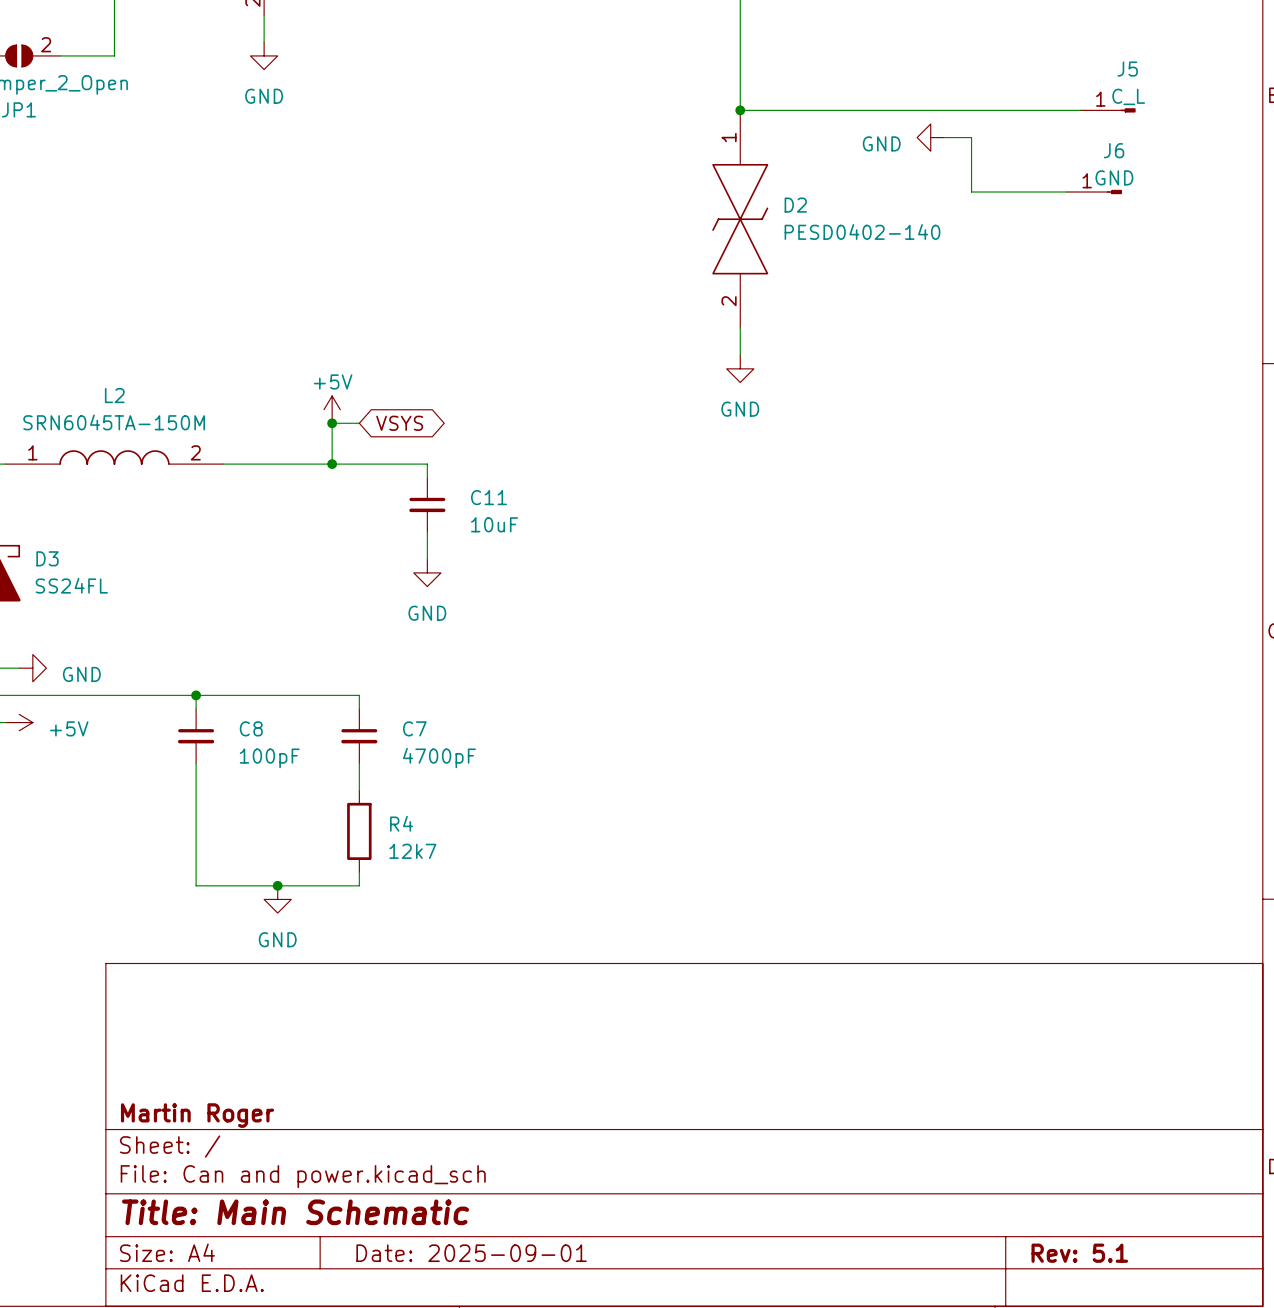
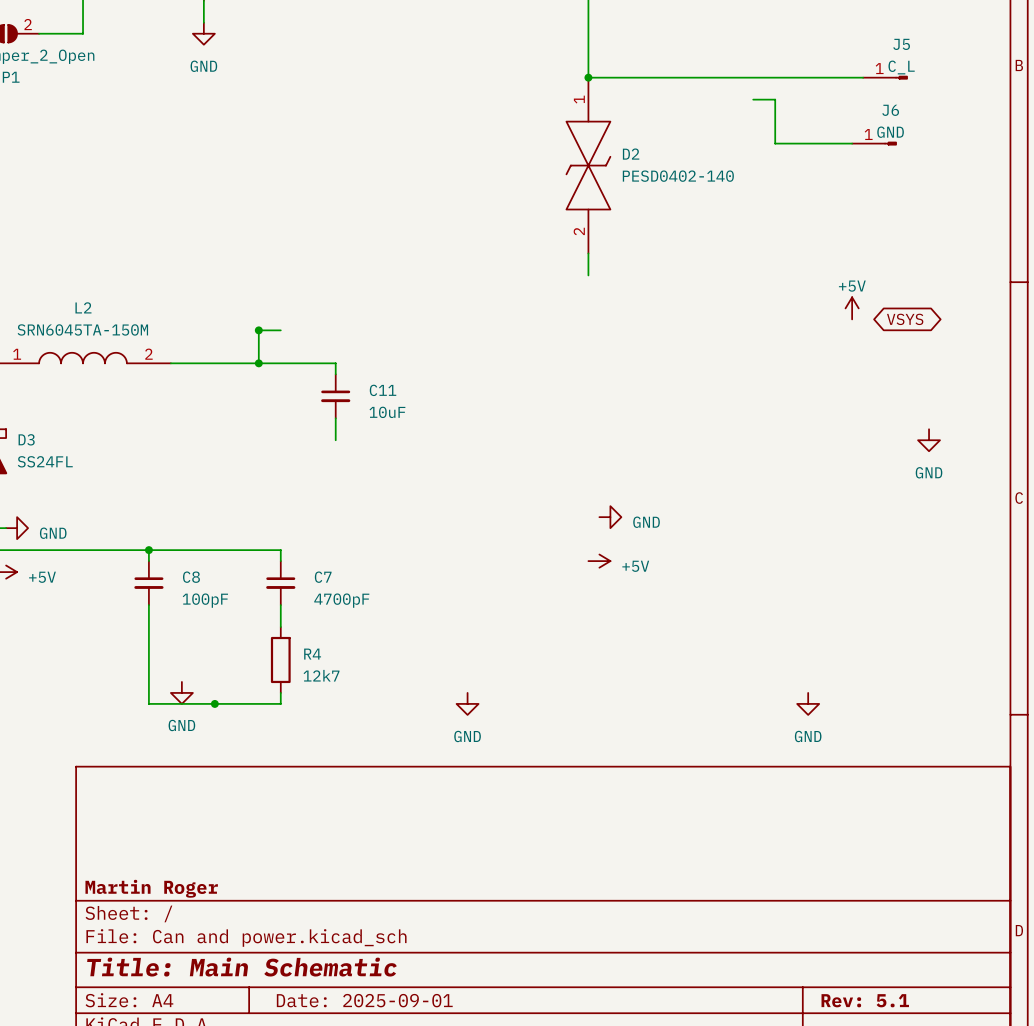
power symbol: GND (930, 137) -> none
power symbol: GND (740, 368) -> none
power symbol: none -> +5V (852, 308)
power symbol: +5V (332, 409) -> none
global label: none -> VSYS (905, 319)
global label: VSYS (399, 423) -> none
power symbol: none -> GND (929, 440)
power symbol: GND (427, 572) -> none
power symbol: none -> GND (610, 517)
power symbol: none -> +5V (599, 561)
power symbol: none -> GND (467, 703)
power symbol: none -> GND (808, 703)
power symbol position: GND (277, 899) -> GND (181, 692)

